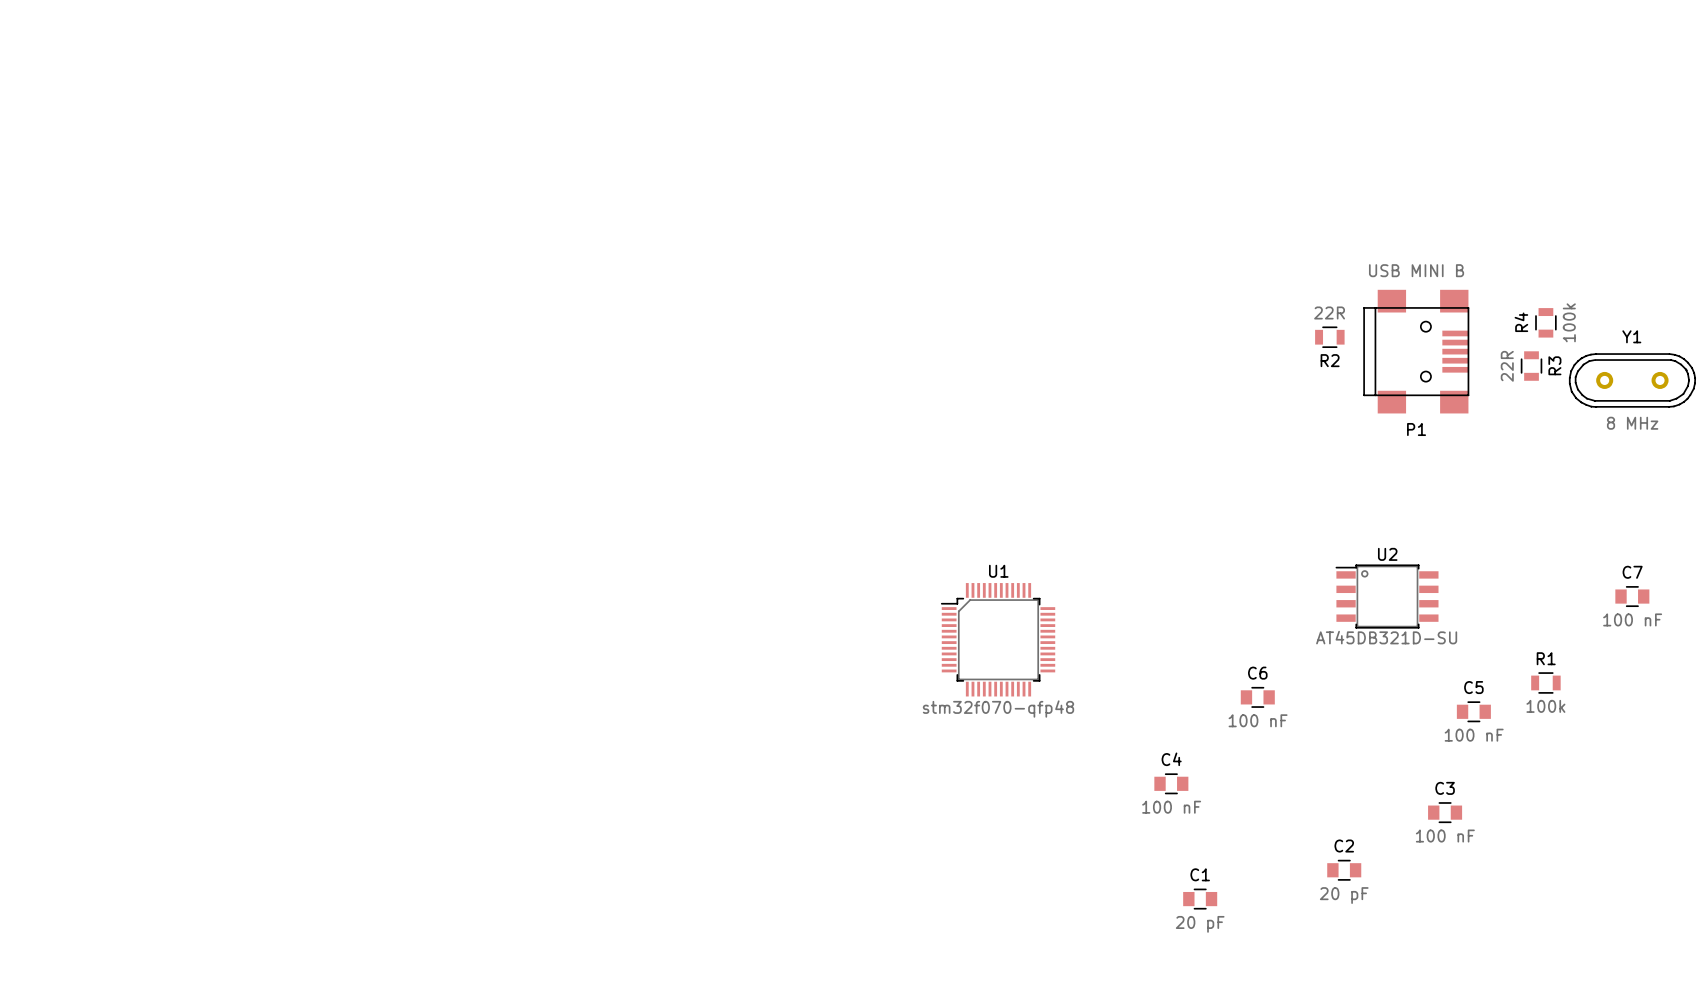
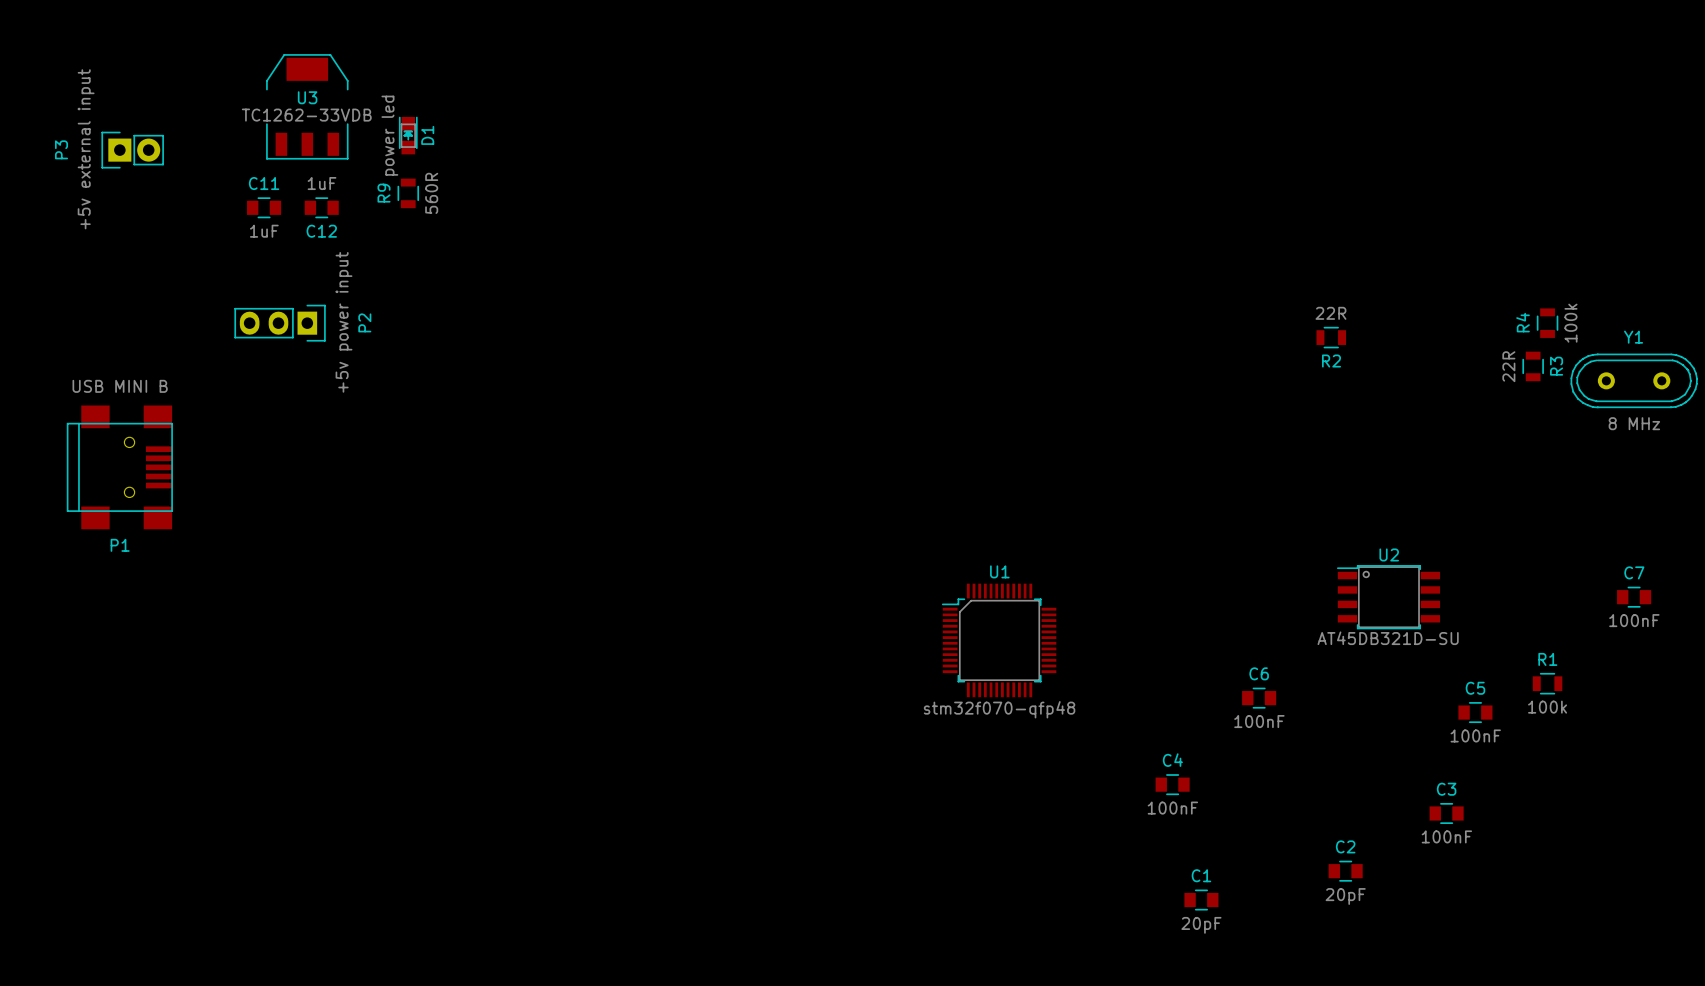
U3: none -> TC1262-33VDB (307, 106)
D1: none -> power led (408, 135)
P3: none -> +5v external input (132, 150)
R9: none -> 560R (408, 193)
C11: none -> 1uF (264, 207)
C12: none -> 1uF (321, 207)
P2: none -> +5v power input (280, 323)
P1 position: (1416, 351) -> (119, 467)
C7 value: 100 nF (1632, 619) -> 100nF (1634, 620)
C6 value: 100 nF (1258, 720) -> 100nF (1259, 721)
C5 value: 100 nF (1474, 735) -> 100nF (1475, 735)
C4 value: 100 nF (1171, 807) -> 100nF (1172, 808)
C3 value: 100 nF (1445, 836) -> 100nF (1446, 836)
C2 value: 20 pF (1344, 895) -> 20pF (1345, 896)
C1 value: 20 pF (1200, 924) -> 20pF (1201, 925)

